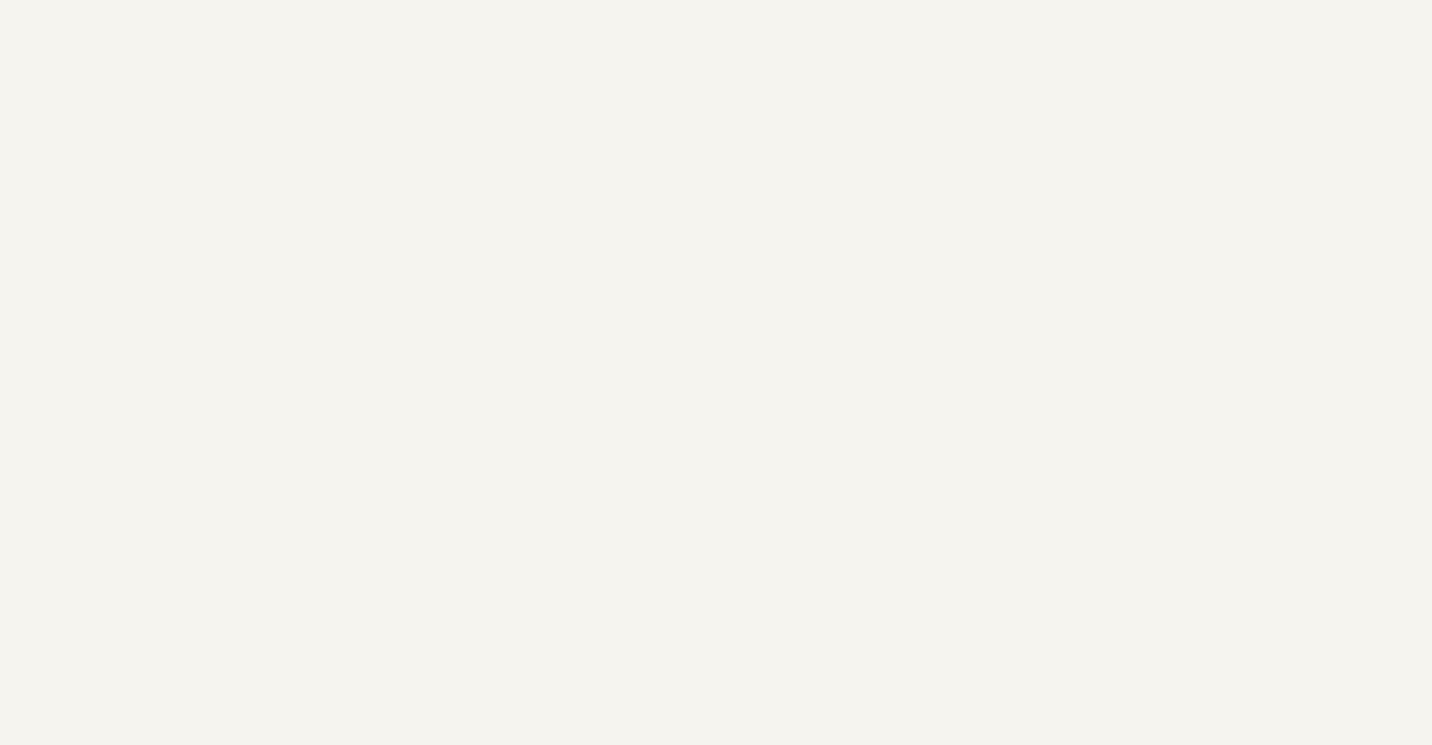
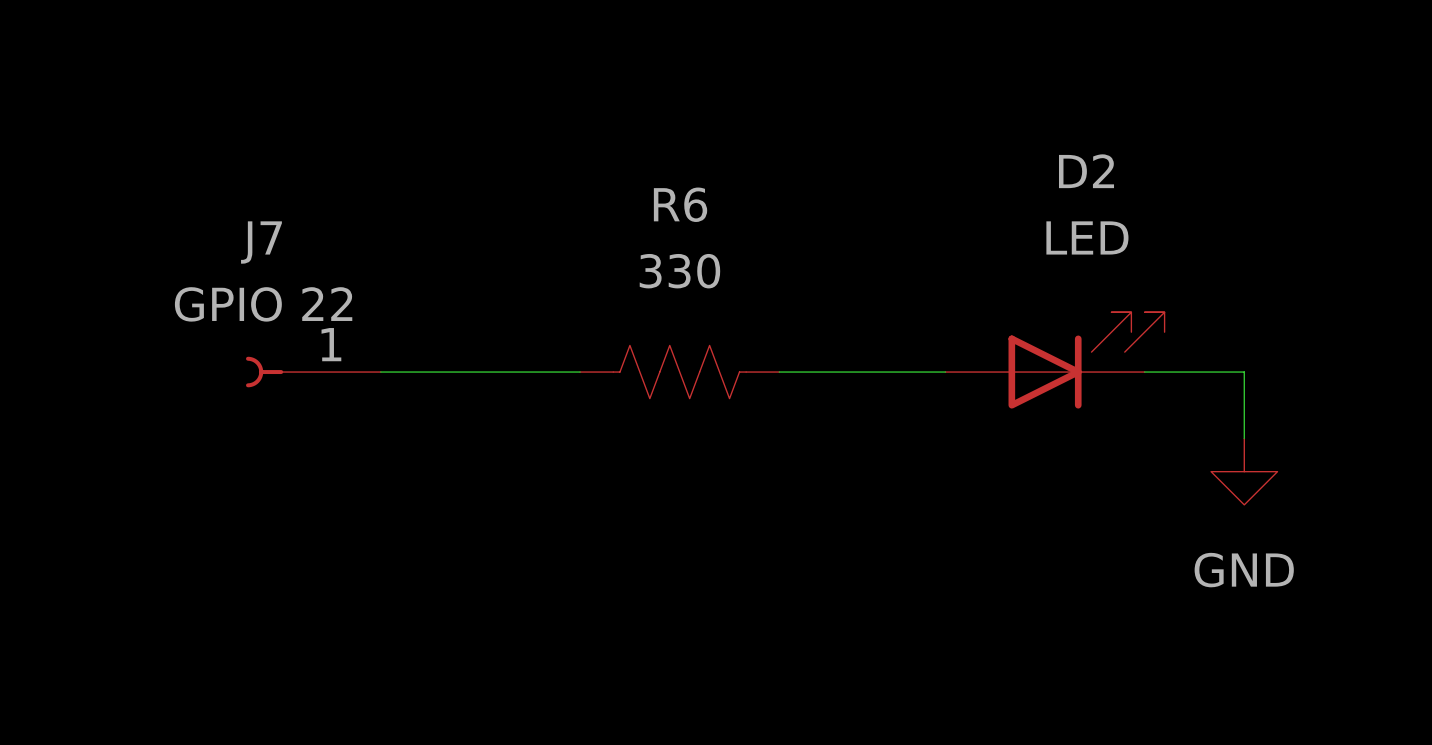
D2: none -> LED (1055, 360)
J7: none -> GPIO 22 (313, 372)
wire: none -> (380, 372) (580, 372)
R6: none -> 330 (679, 372)
wire: none -> (779, 372) (945, 372)
wire: none -> (1144, 372) (1244, 372) (1244, 438)
power symbol: none -> GND (1244, 471)

